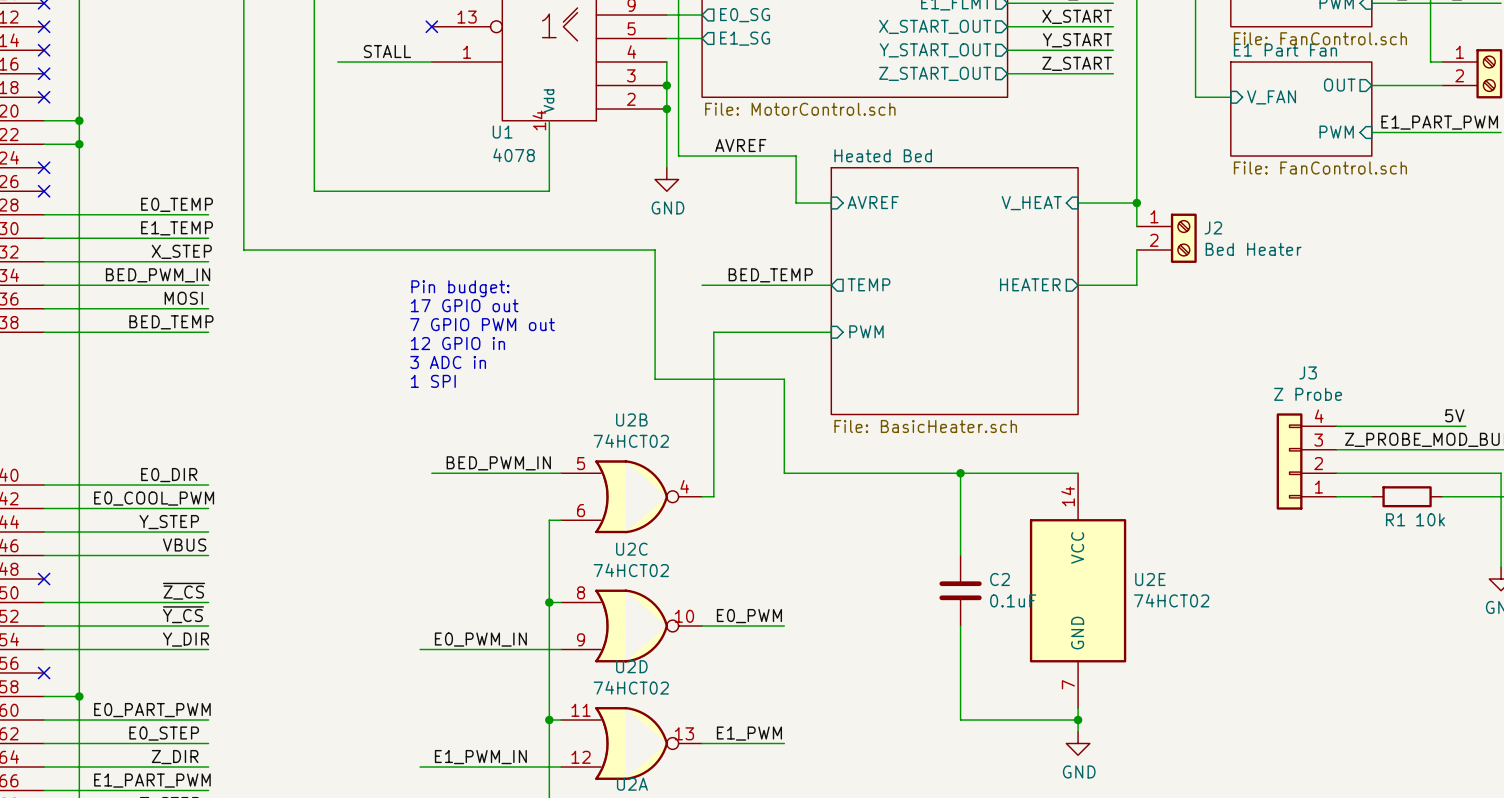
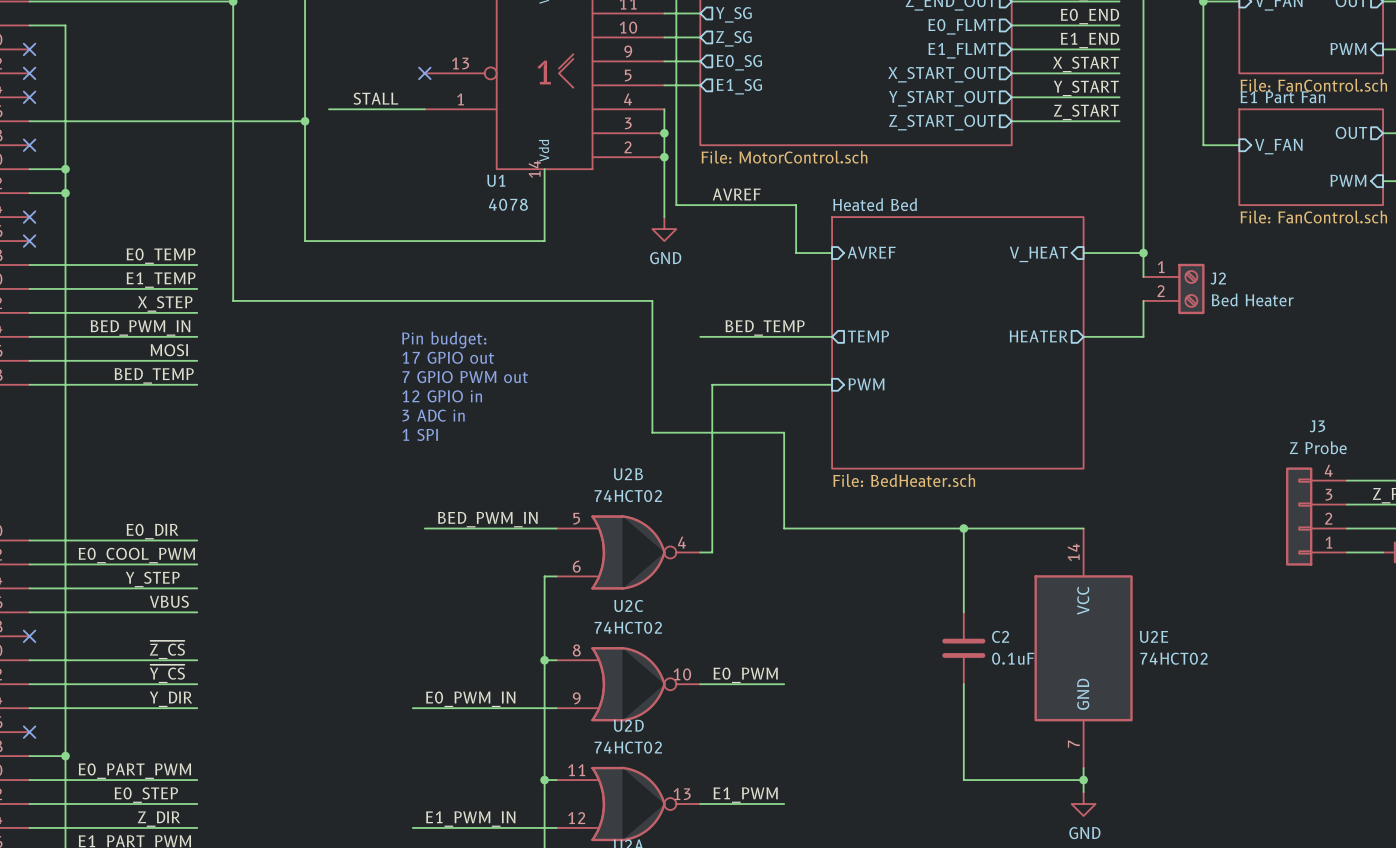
wire: none -> (29, 121) (305, 121)
no-connect mark: (44, 73) -> none
junction: none -> (305, 121)
sheet Heated Bed value: File: BasicHeater.sch (925, 426) -> File: BedHeater.sch (904, 480)

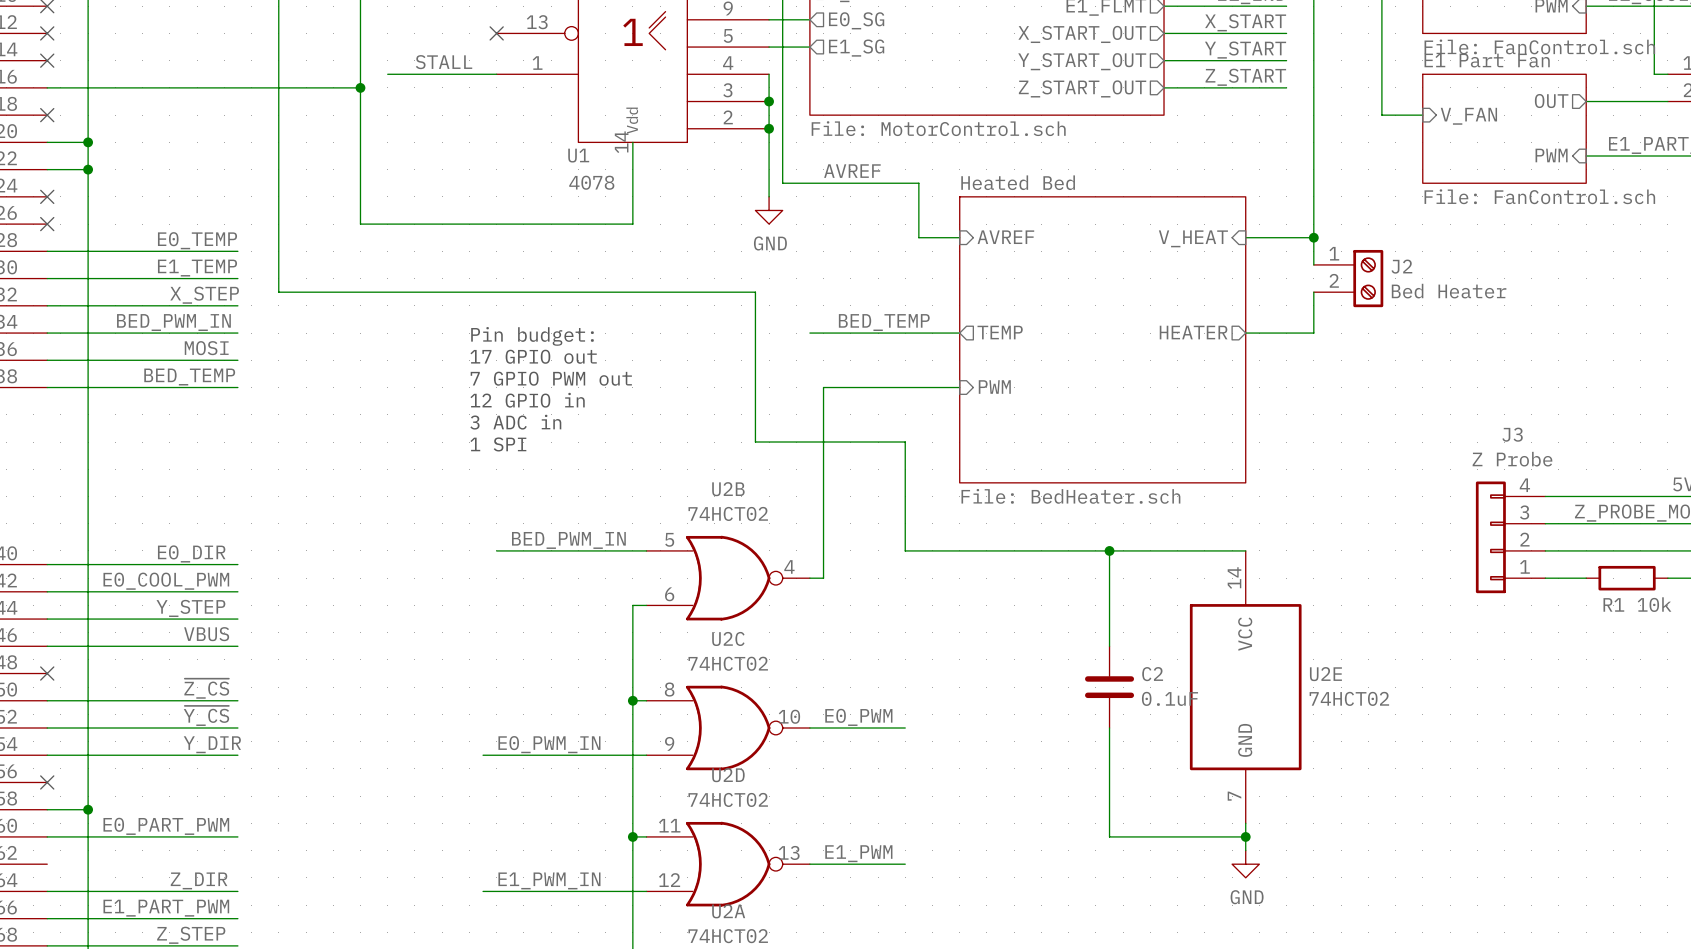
label: E0_STEP (146, 795) -> none
wire: (29, 804) (197, 804) -> none

